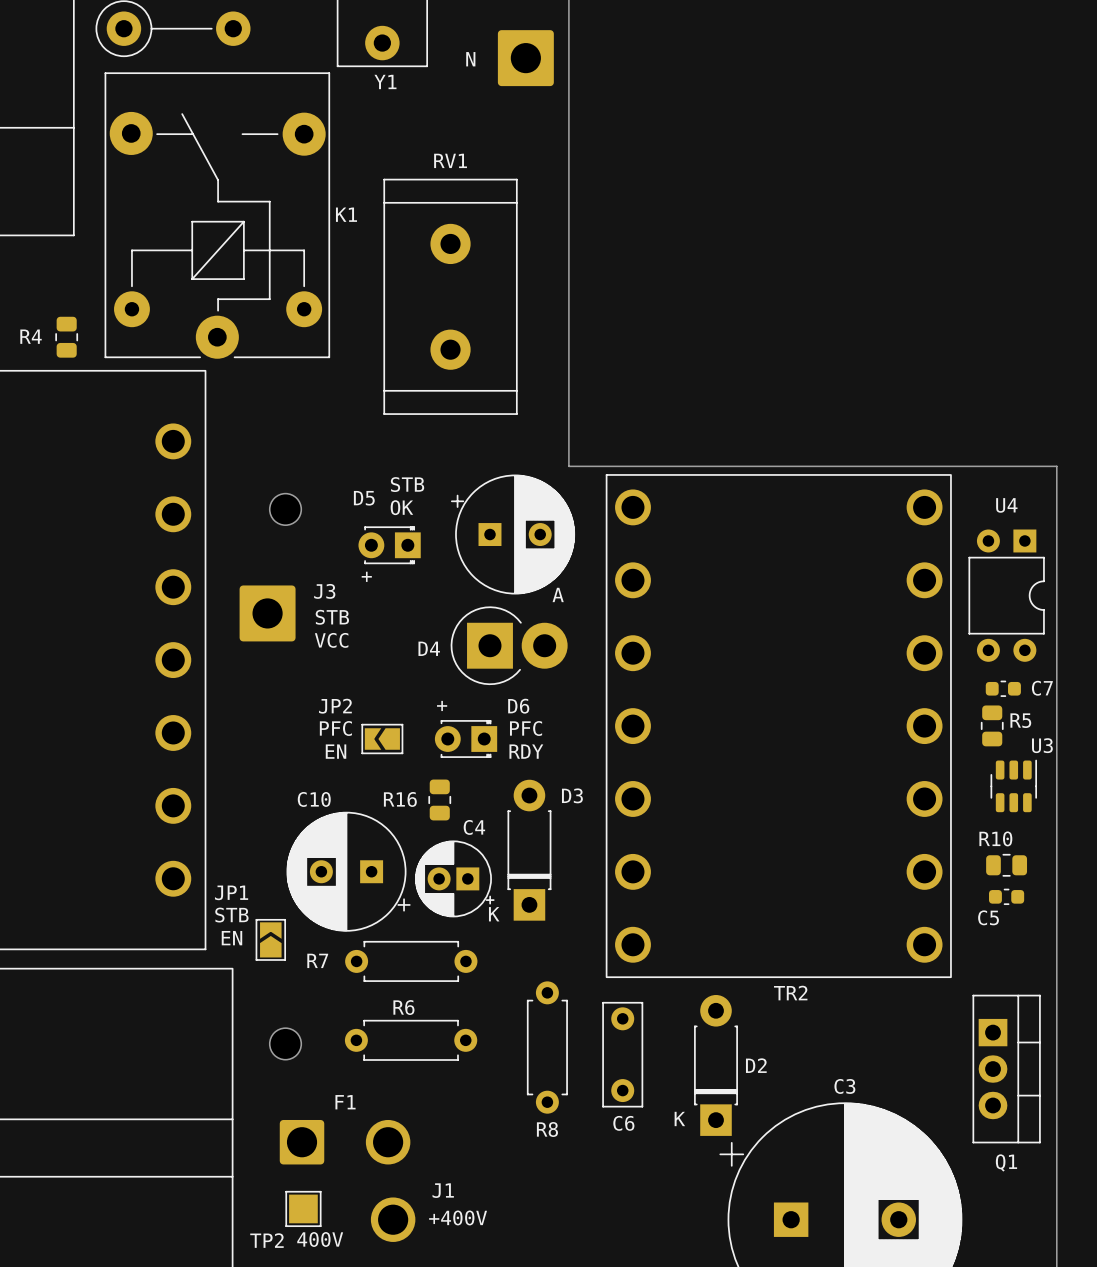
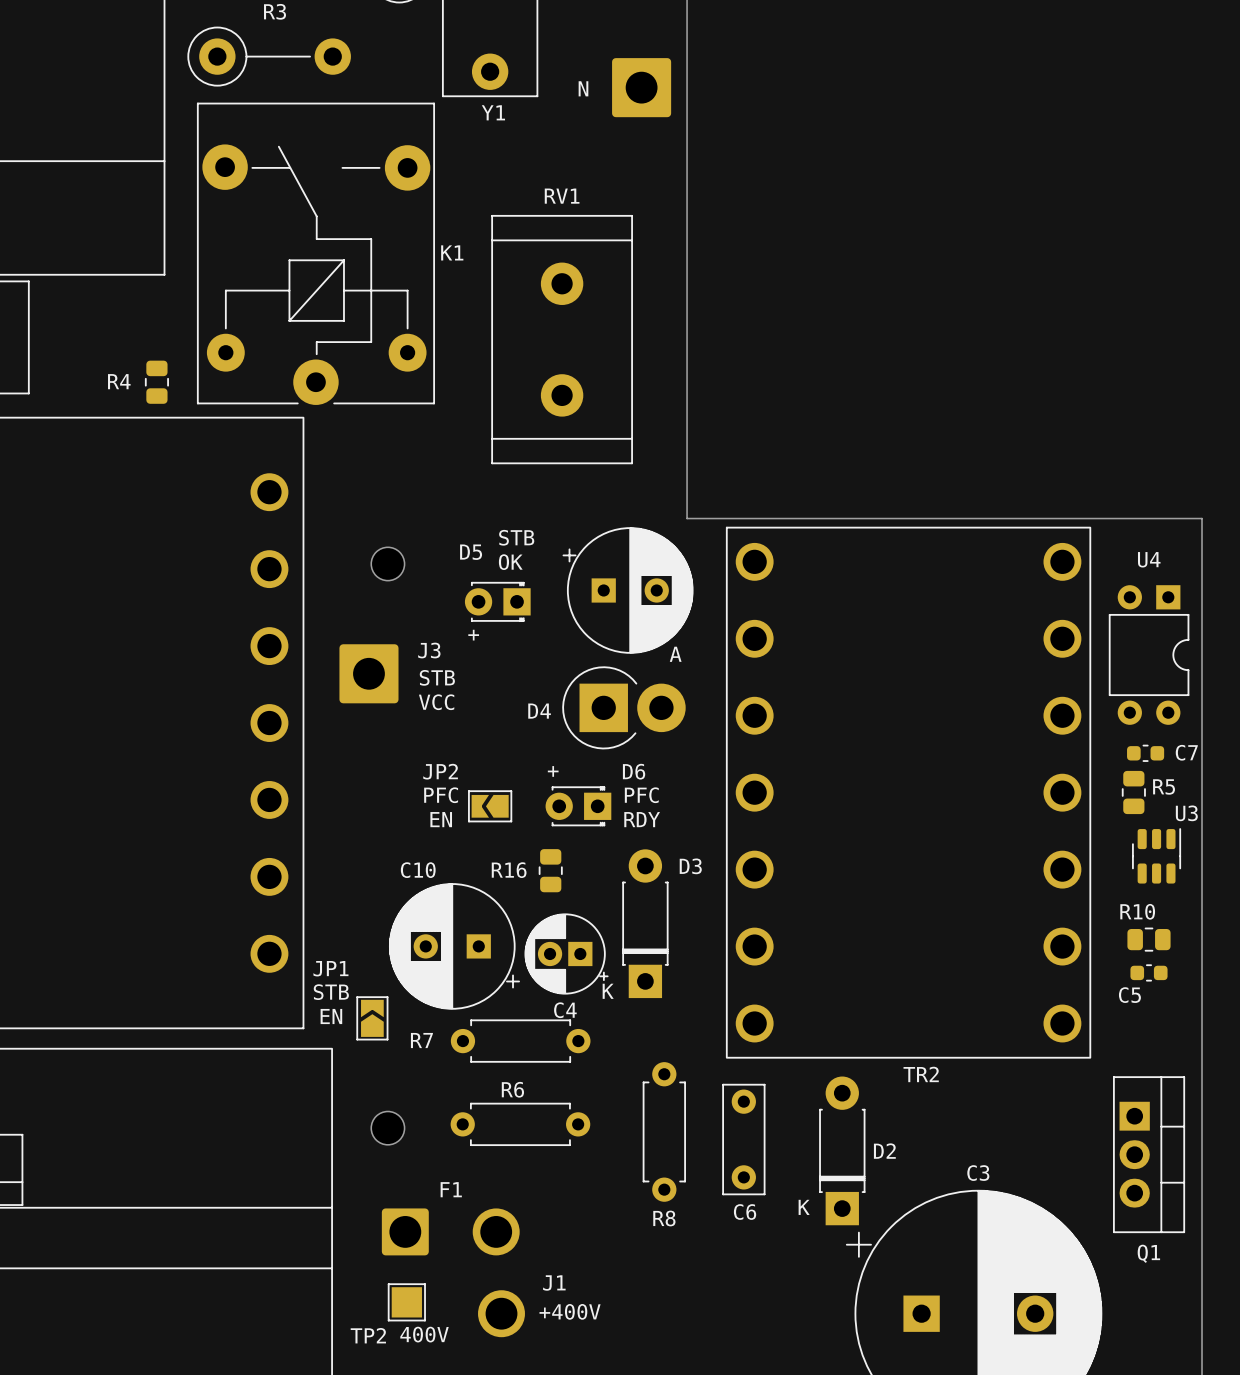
C4 name position: C4 (474, 827) -> C4 (565, 1010)

